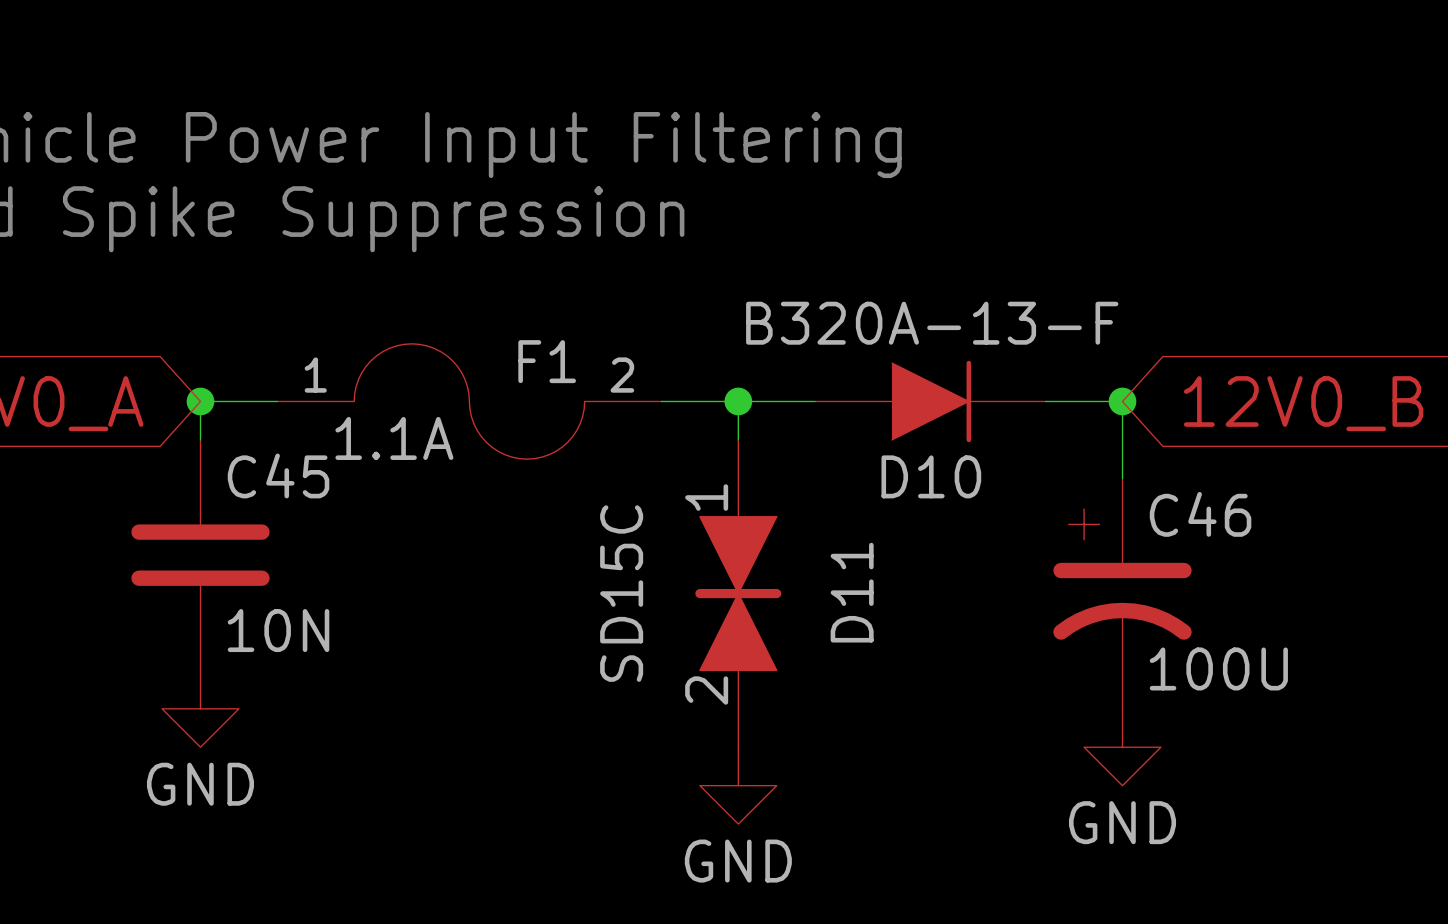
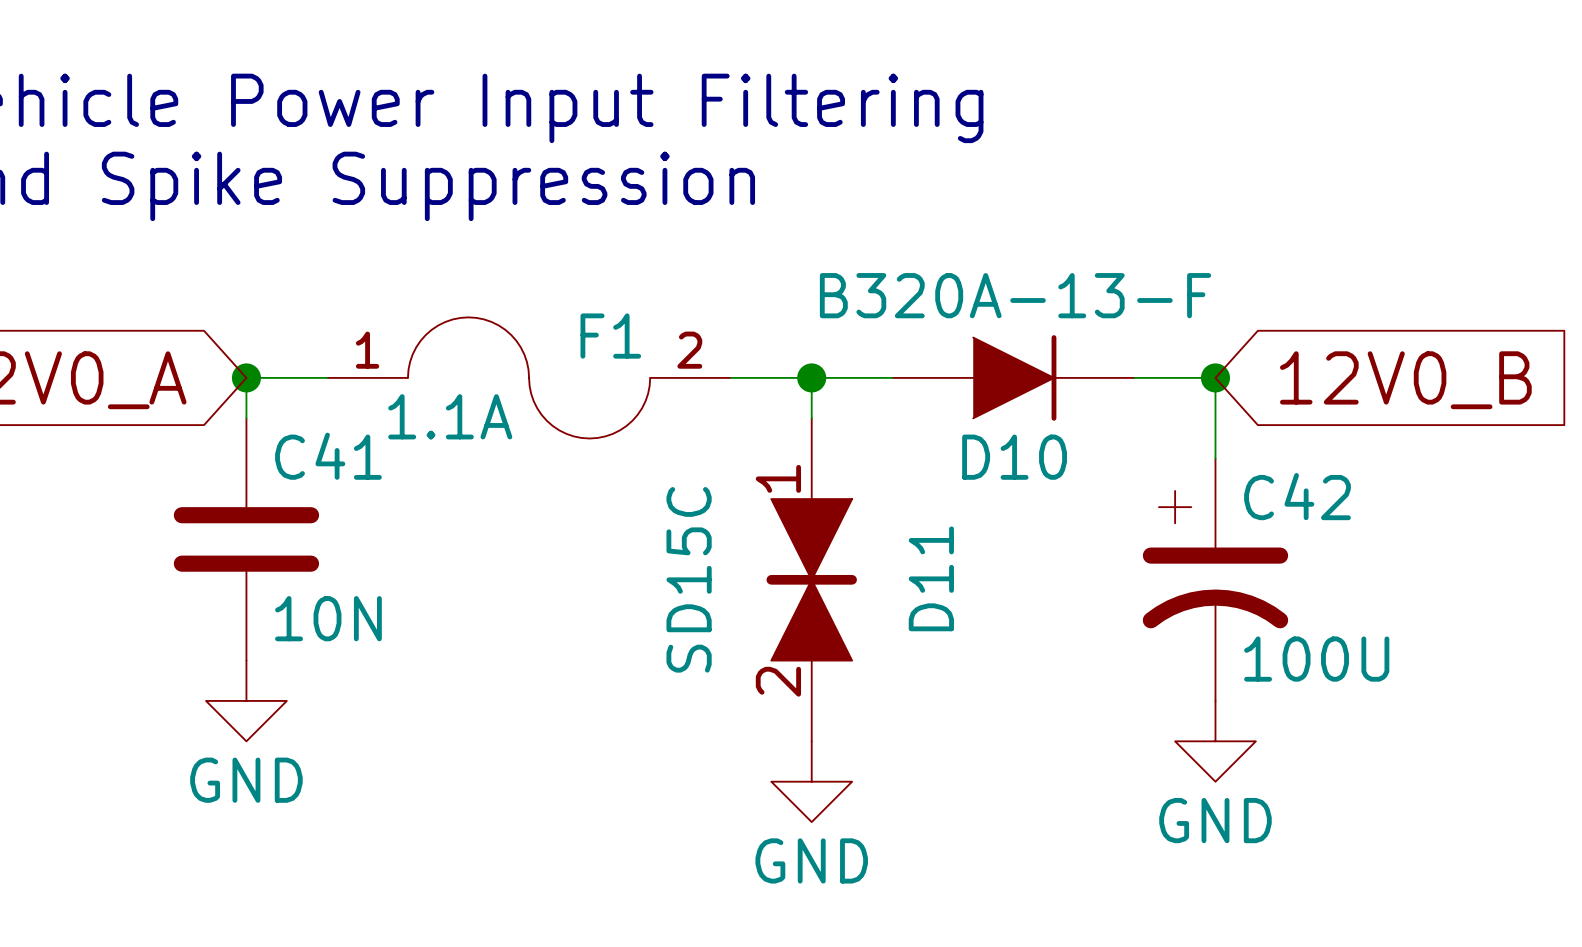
C45 name: C45 (278, 475) -> C41 (328, 456)
C46 name: C46 (1200, 514) -> C42 (1297, 496)

